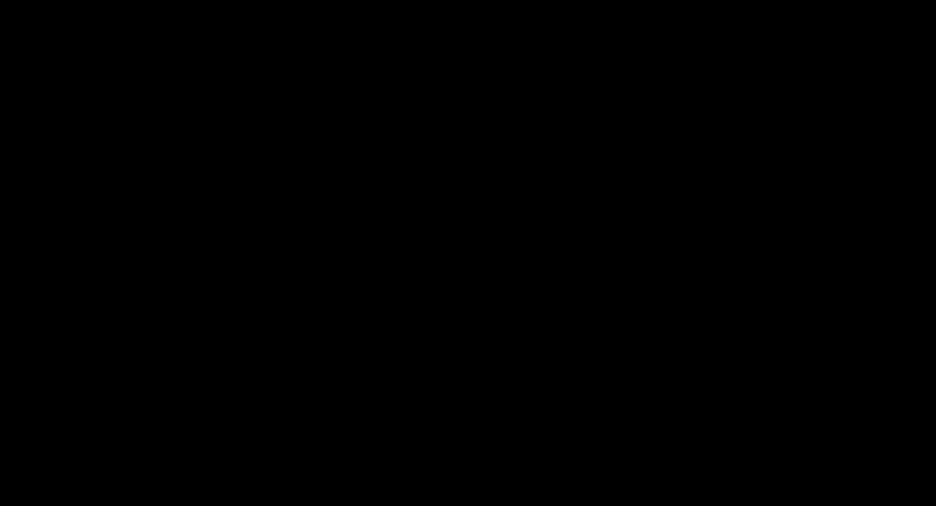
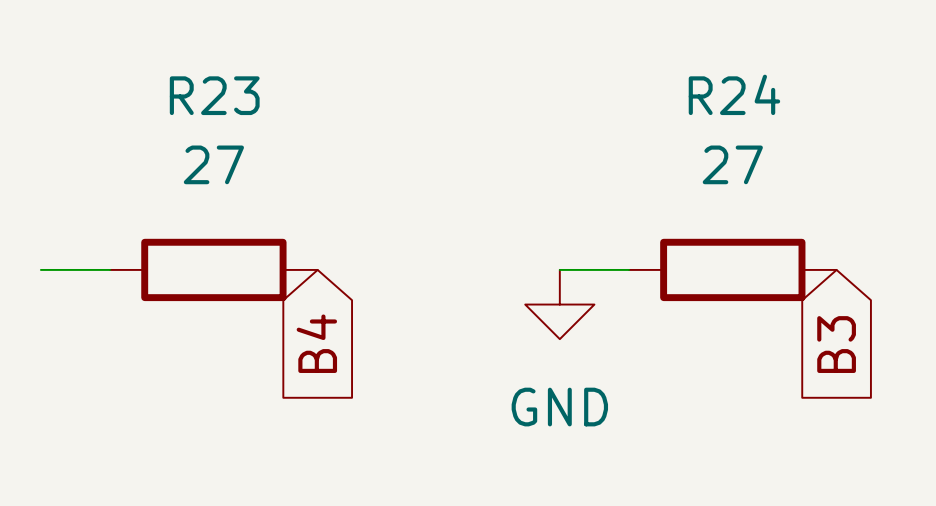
wire: none -> (40, 269) (110, 269)
R23: none -> 27 (213, 269)
wire: none -> (559, 269) (629, 269)
R24: none -> 27 (732, 269)
power symbol: none -> GND (559, 304)
global label: none -> B4 (316, 343)
global label: none -> B3 (836, 344)

